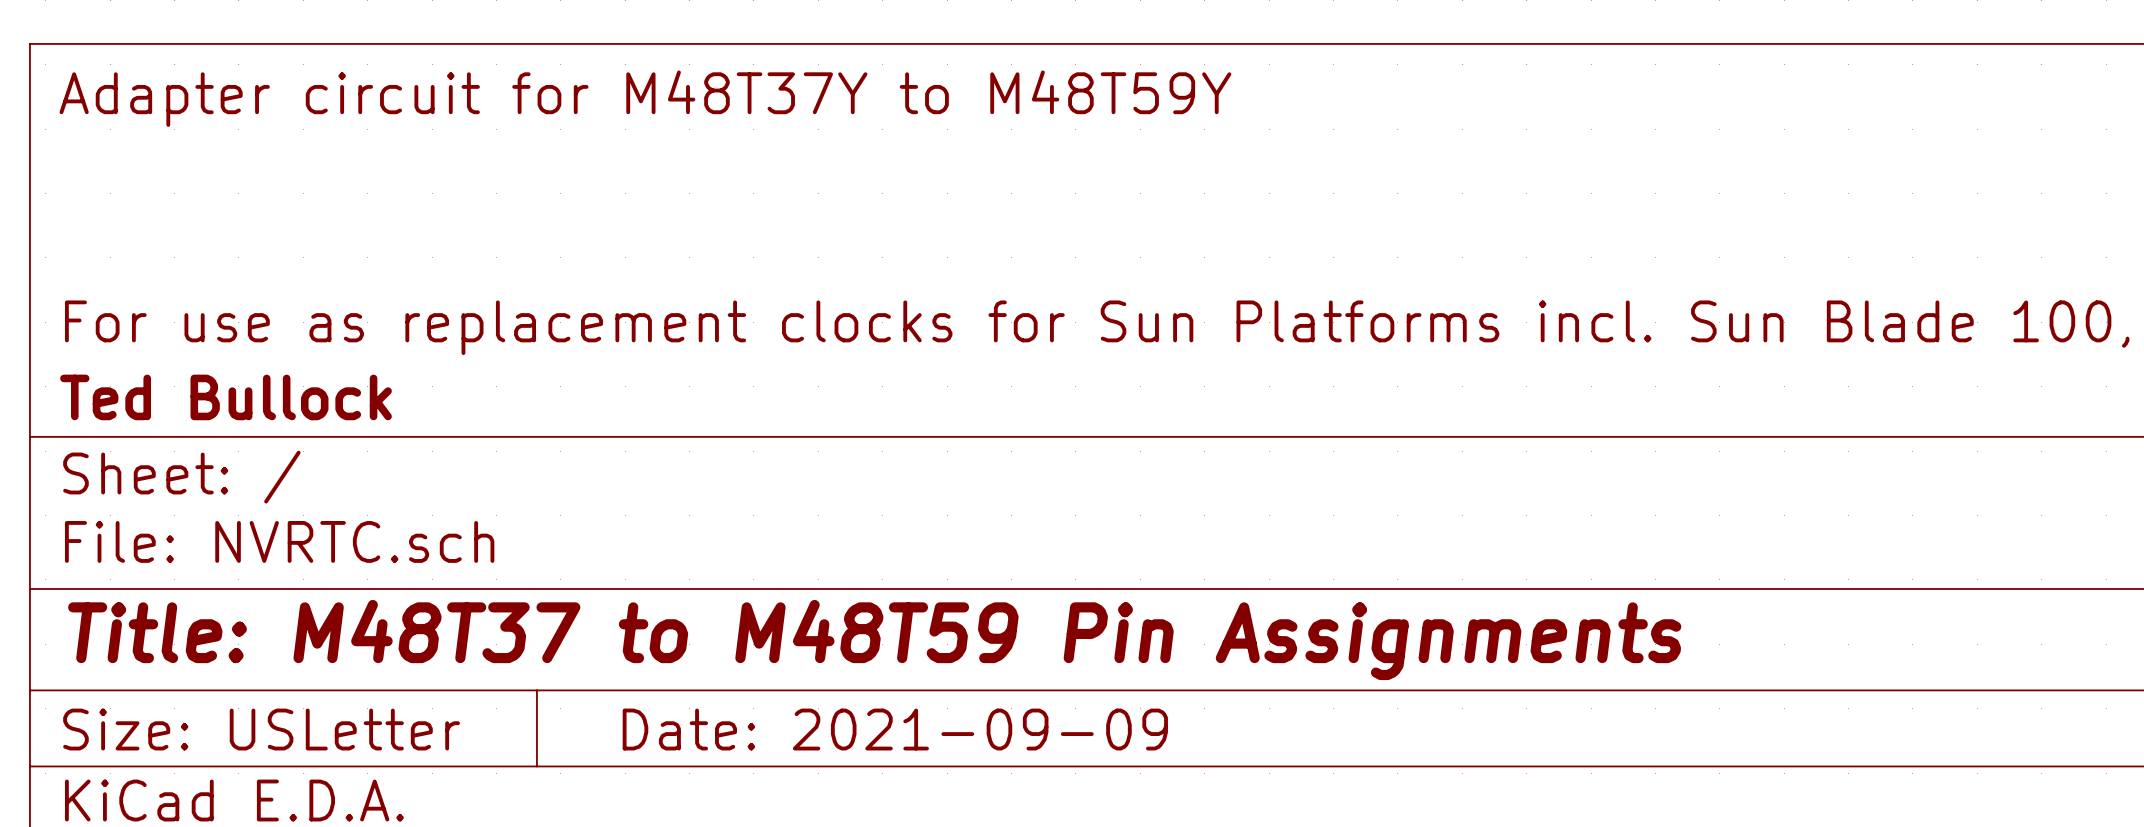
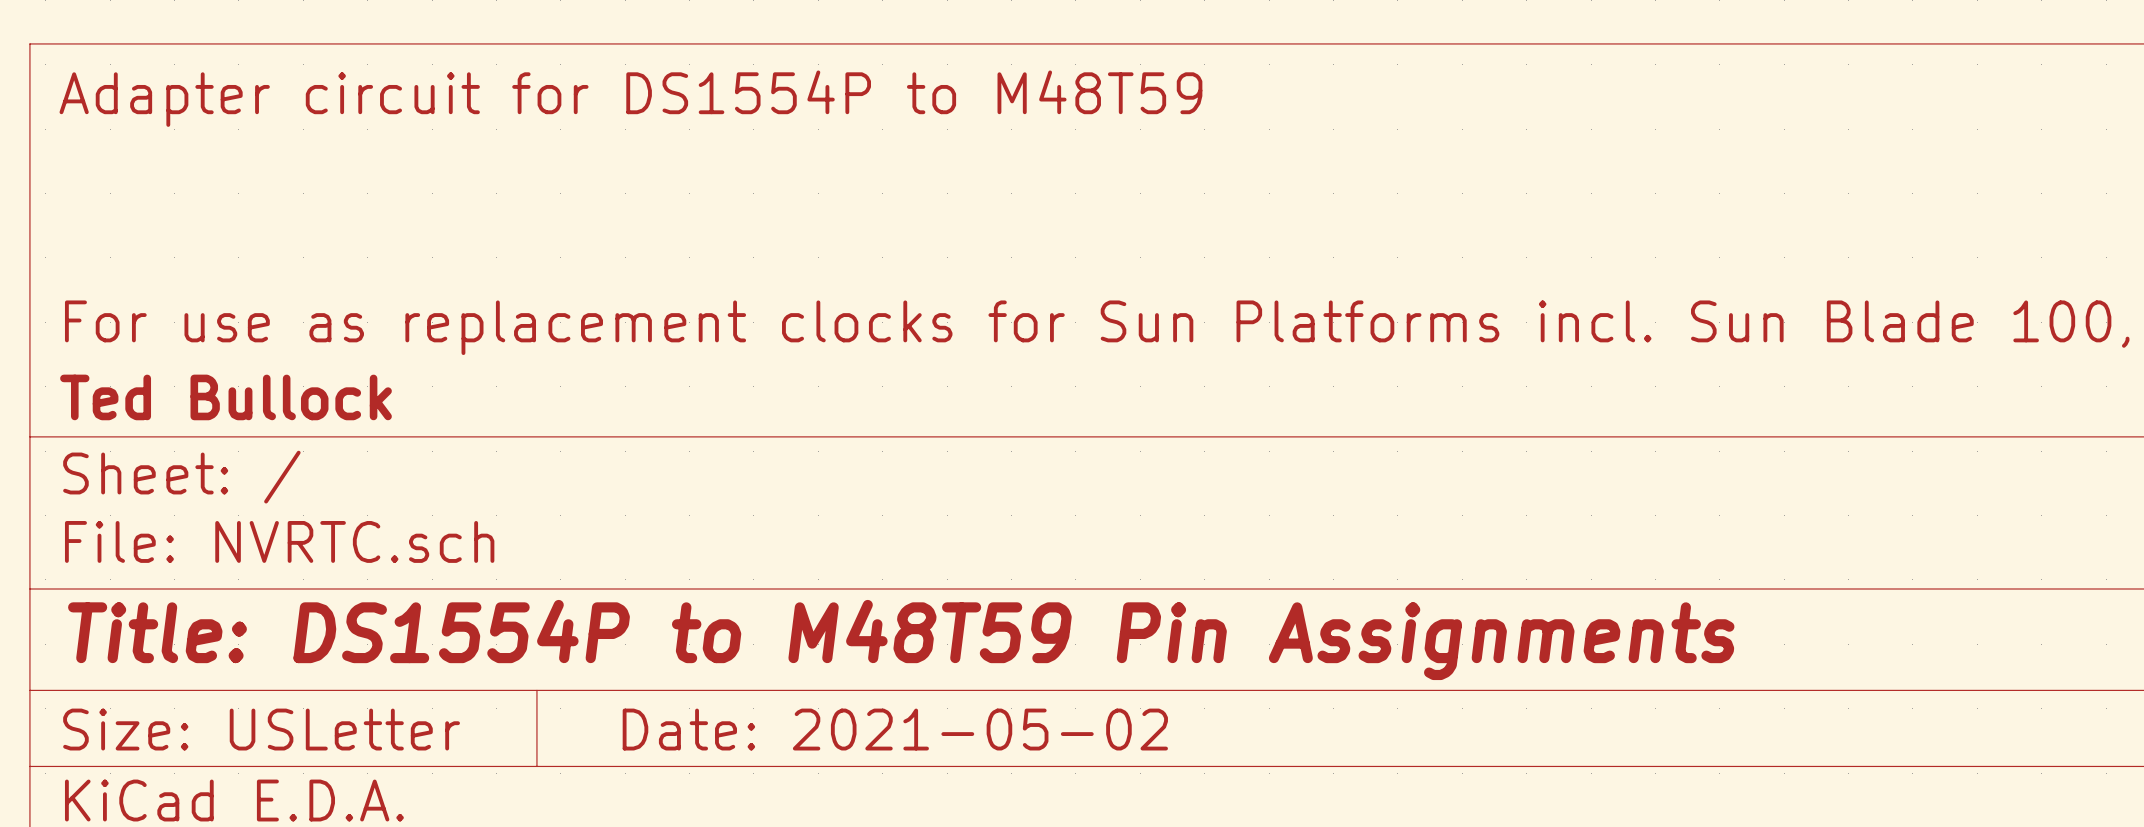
title block: Adapter circuit for M48T37Y to M48T59Y (645, 98) -> Adapter circuit for DS1554P to M48T59 (630, 98)
title block: Title: M48T37 to M48T59 Pin Assignments (874, 639) -> Title: DS1554P to M48T59 Pin Assignments (901, 639)
title block: Date: 2021-09-09 (895, 729) -> Date: 2021-05-02 (895, 729)

